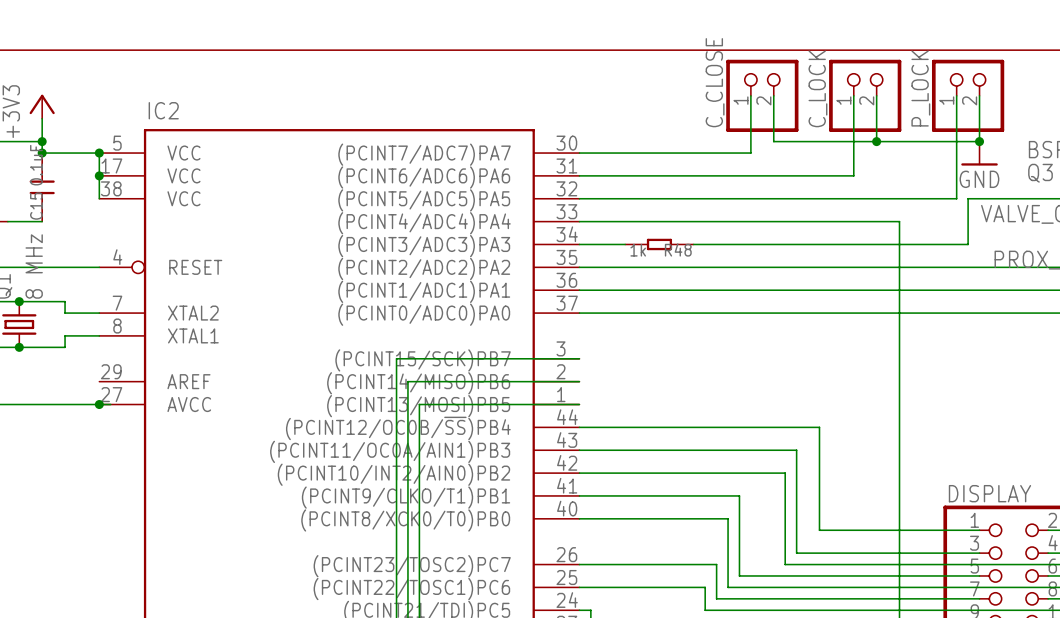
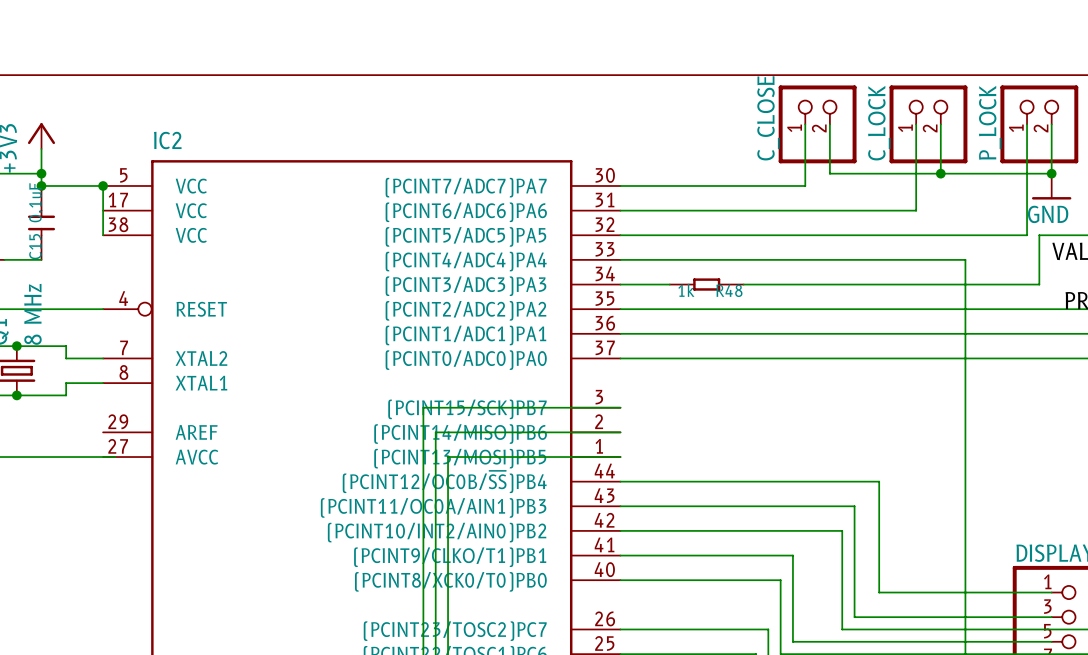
junction: (99, 175) -> none
junction: (99, 404) -> none

